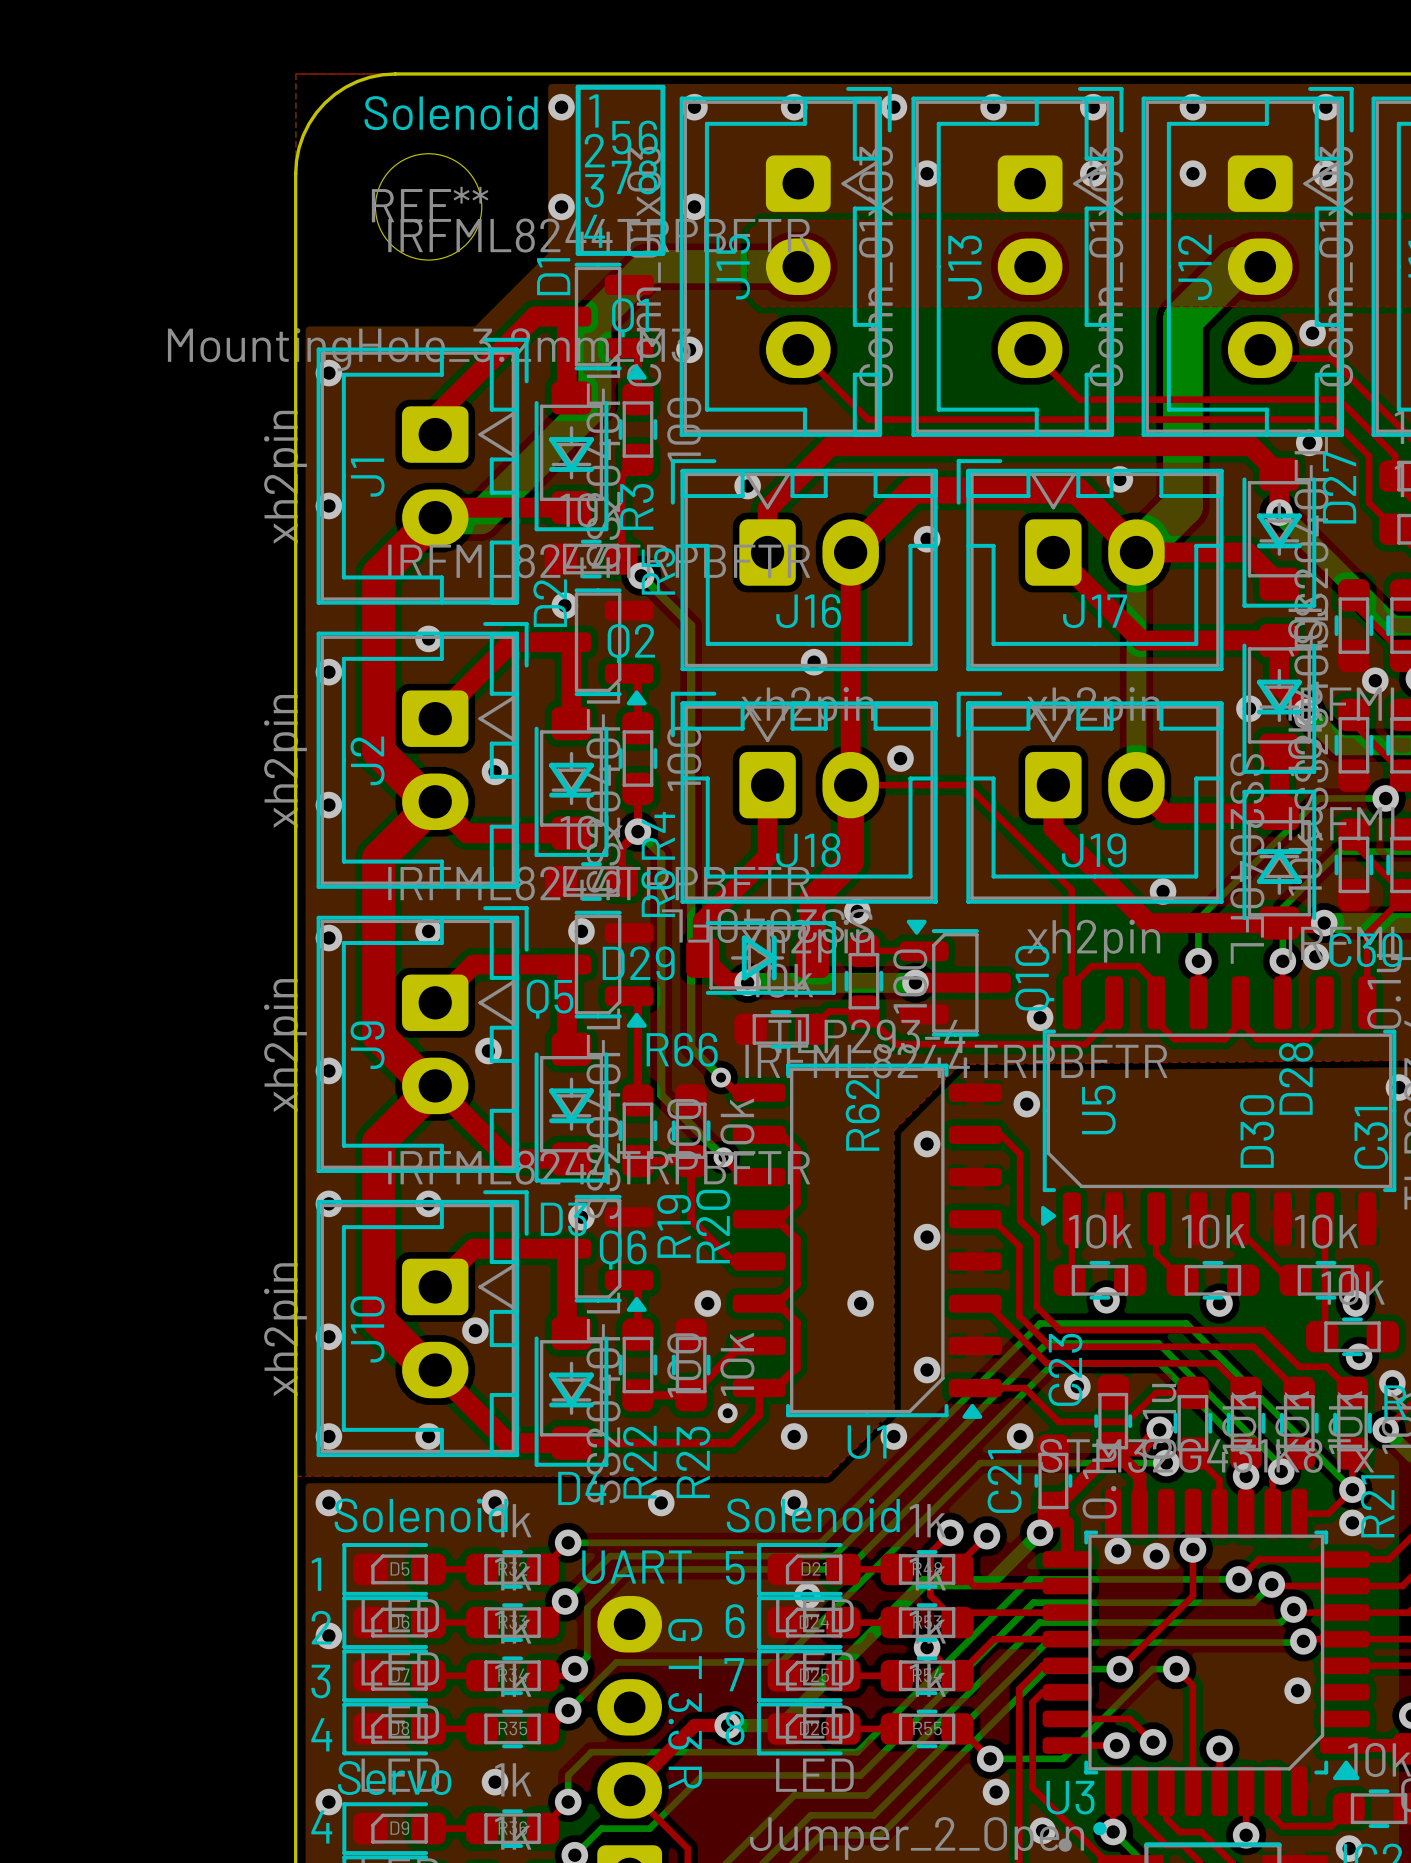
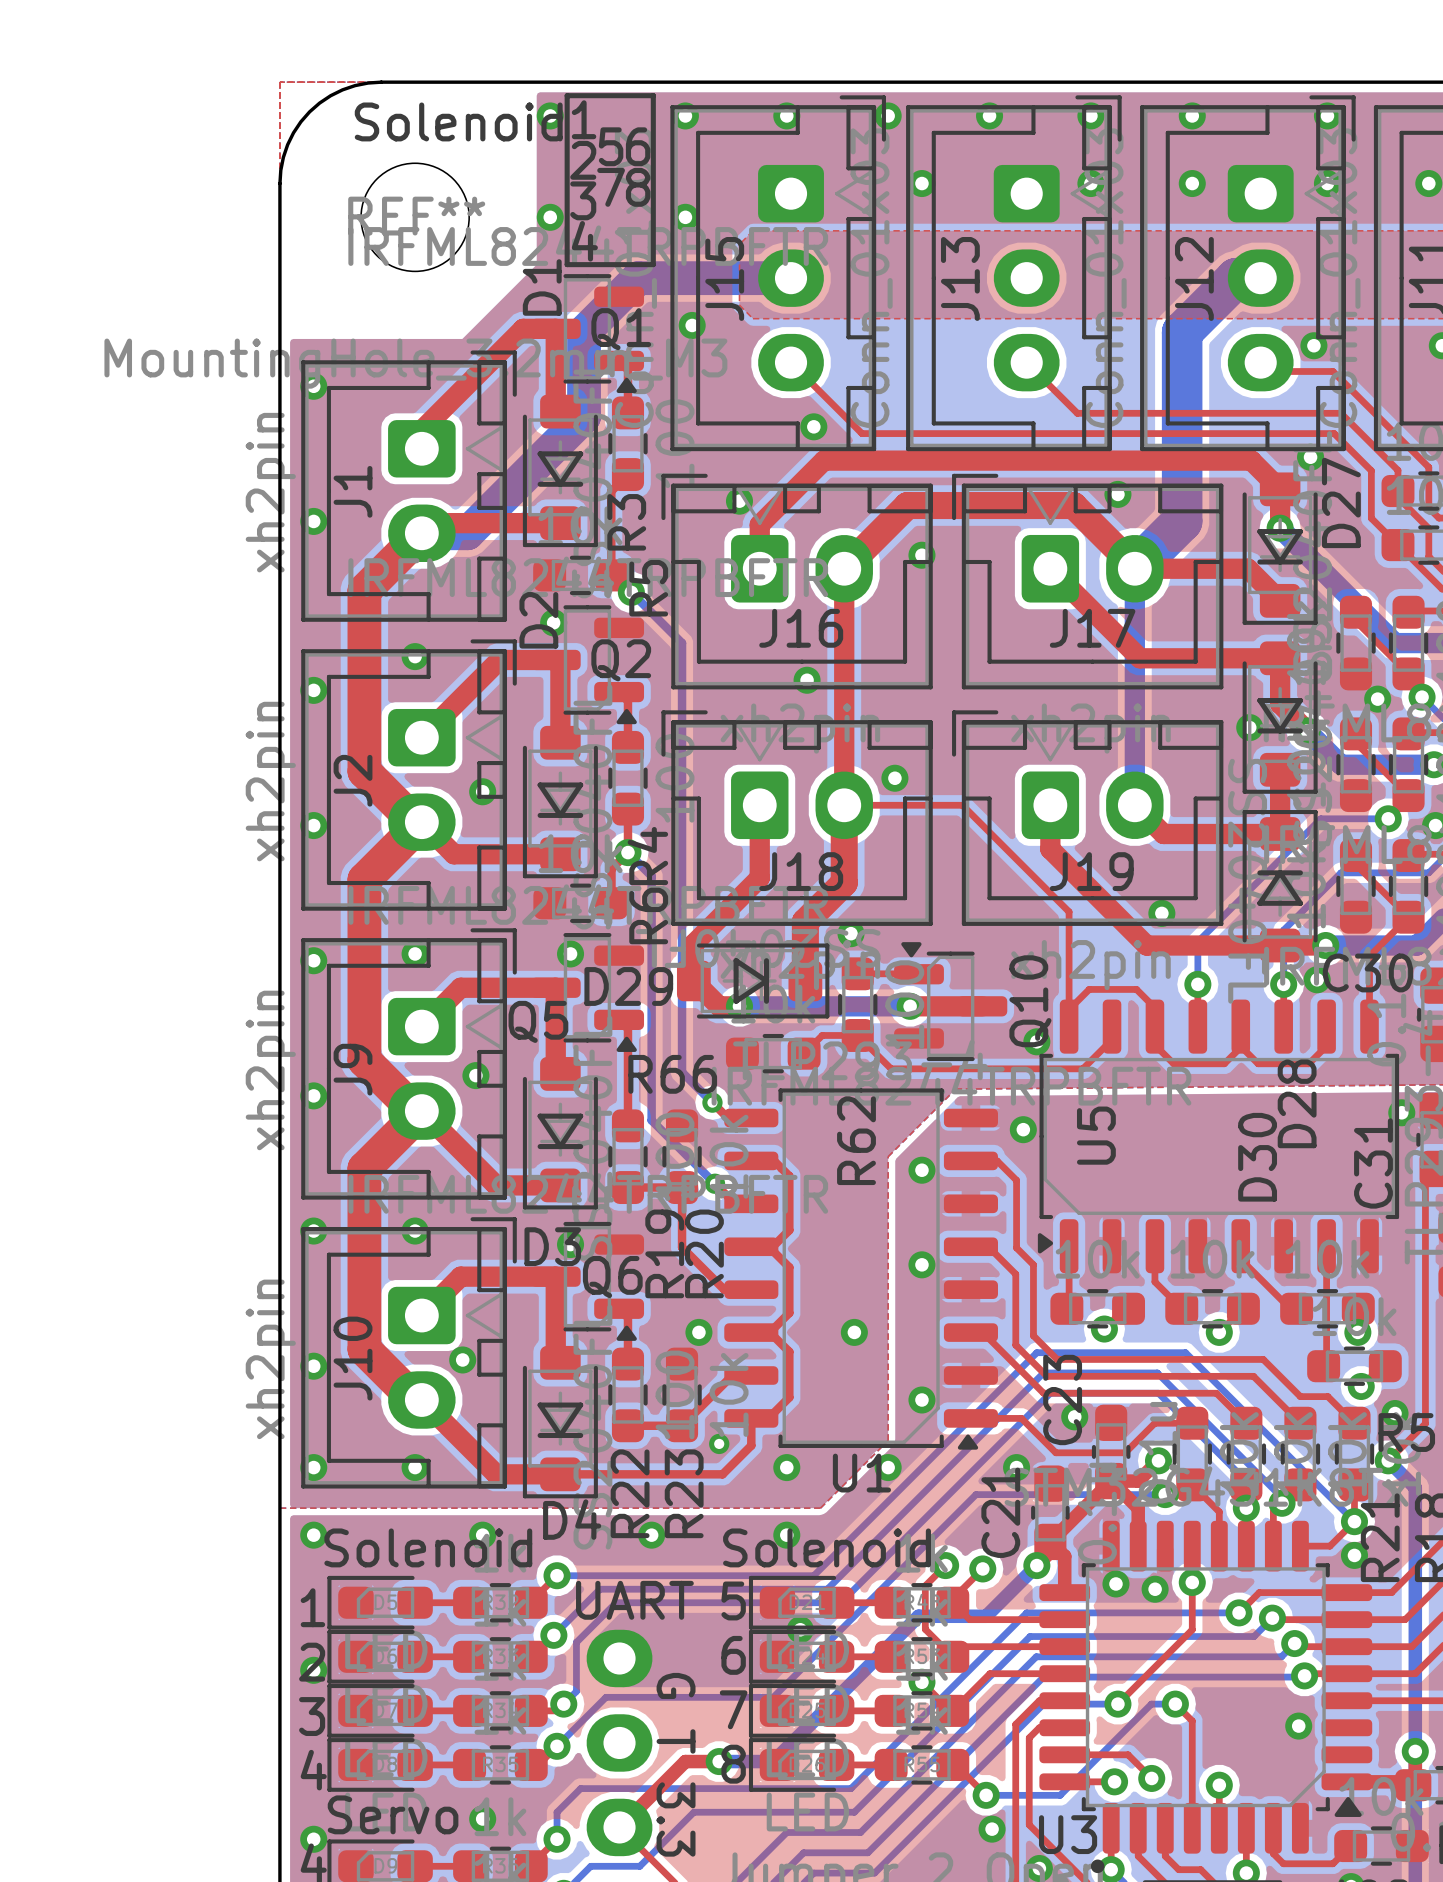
via position: (689, 349) -> (692, 325)
via: none -> (813, 426)

